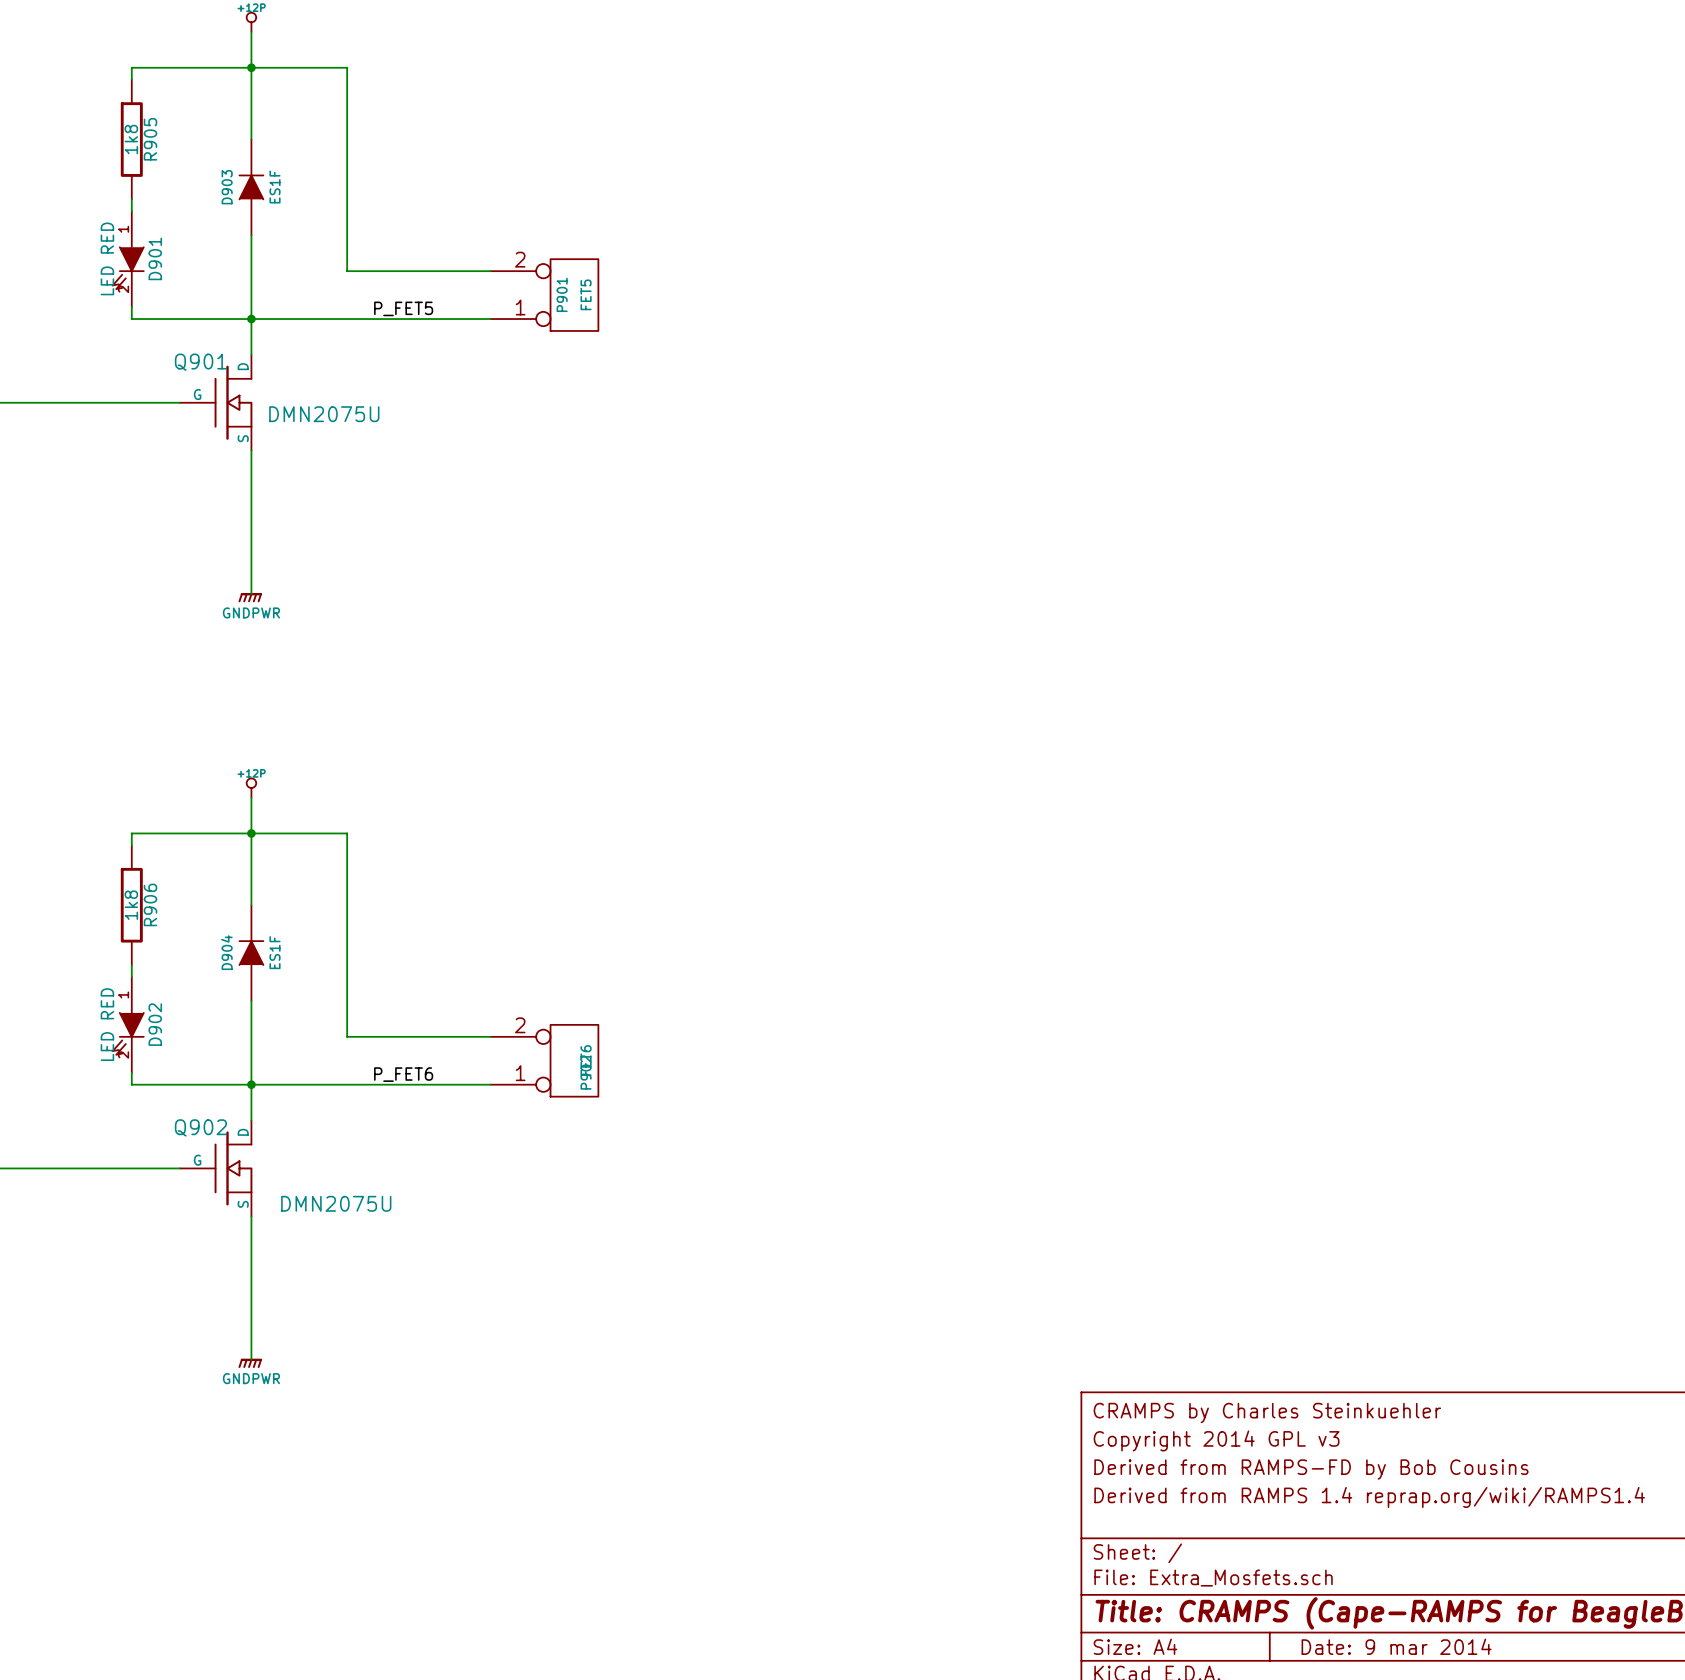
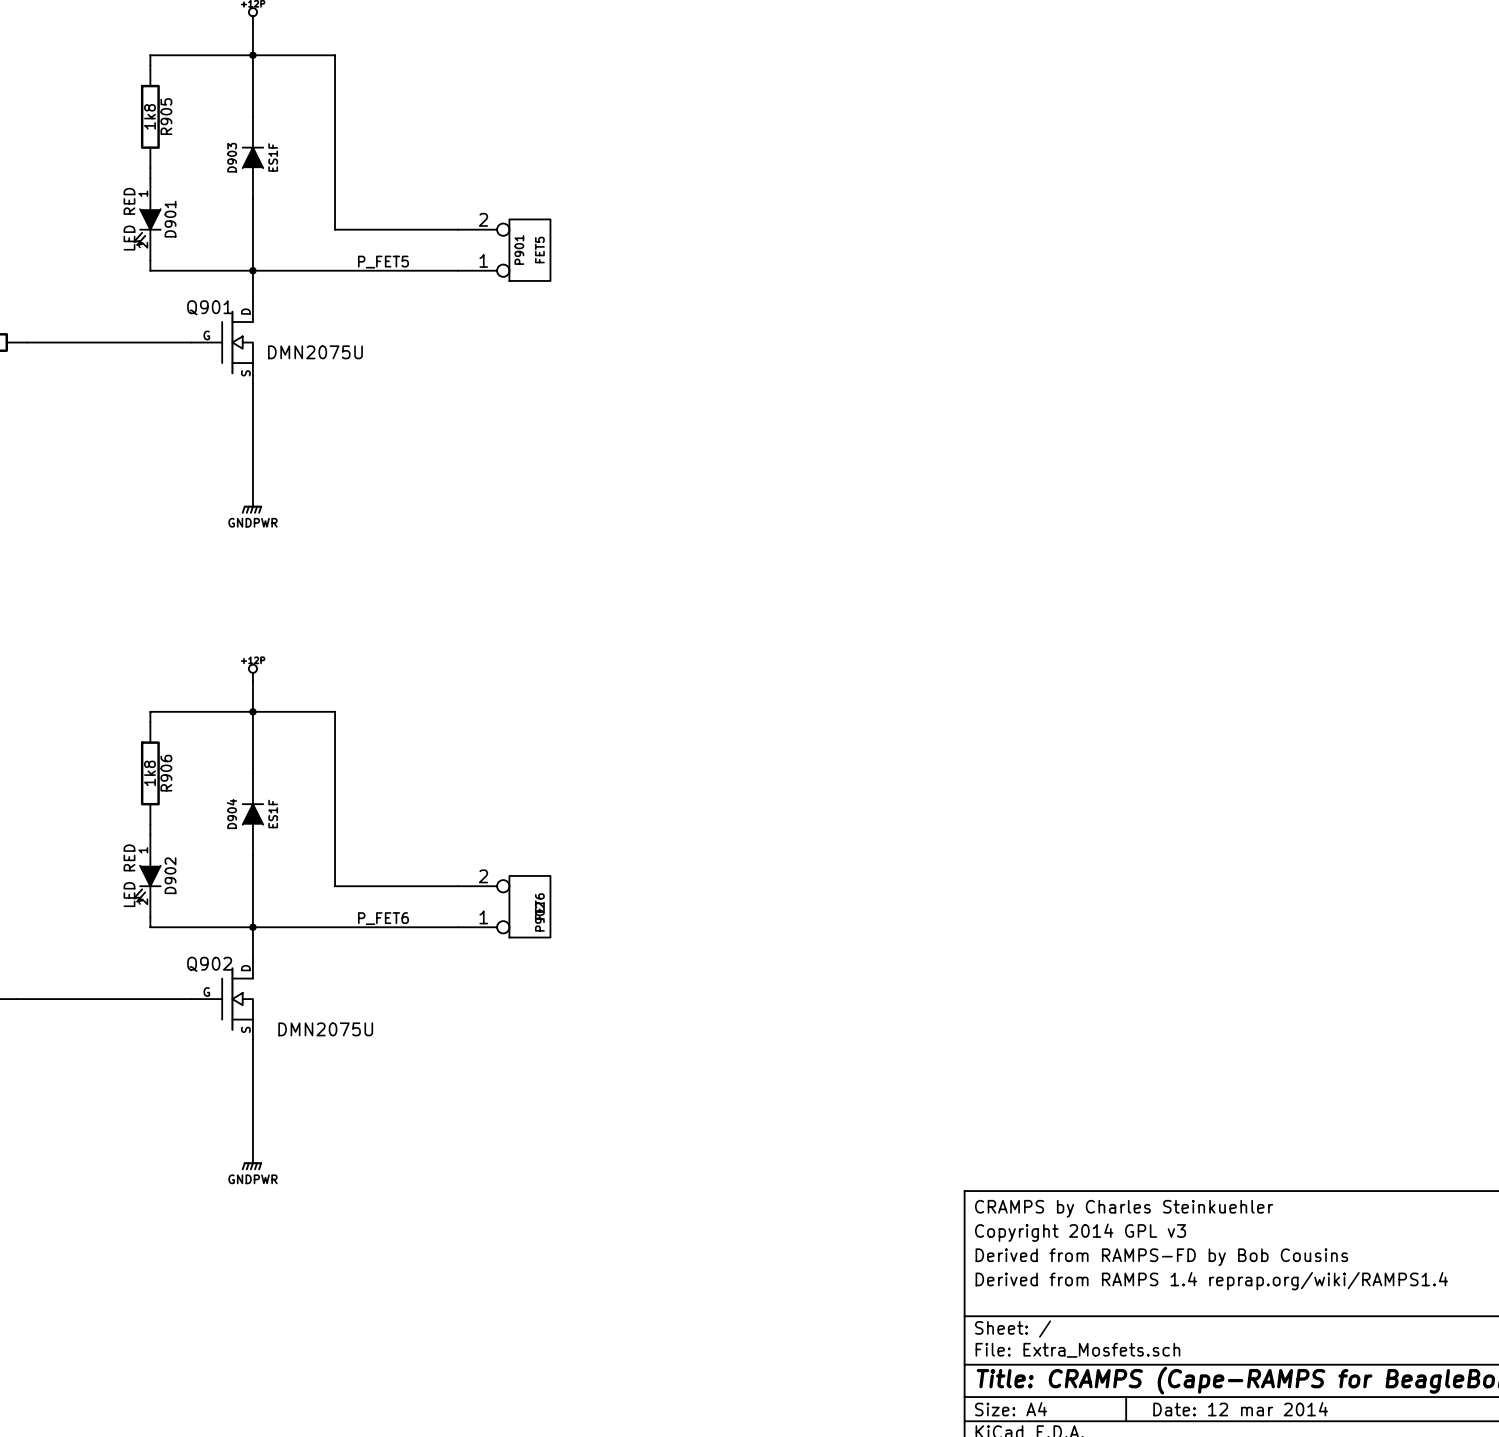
title block: Date: 9 mar 2014 (1396, 1646) -> Date: 12 mar 2014 (1240, 1409)

